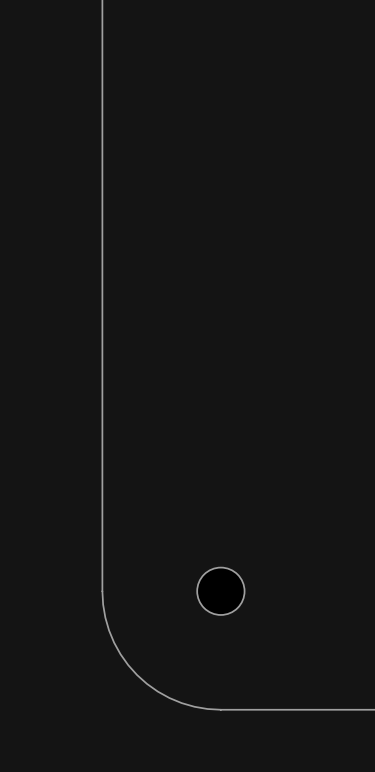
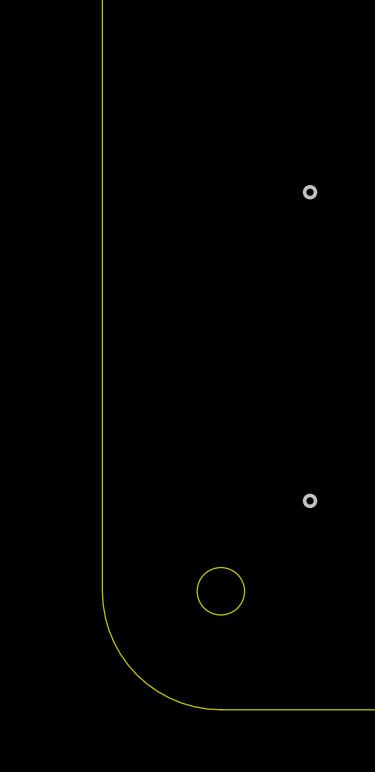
via: none -> (310, 192)
via: none -> (310, 500)

